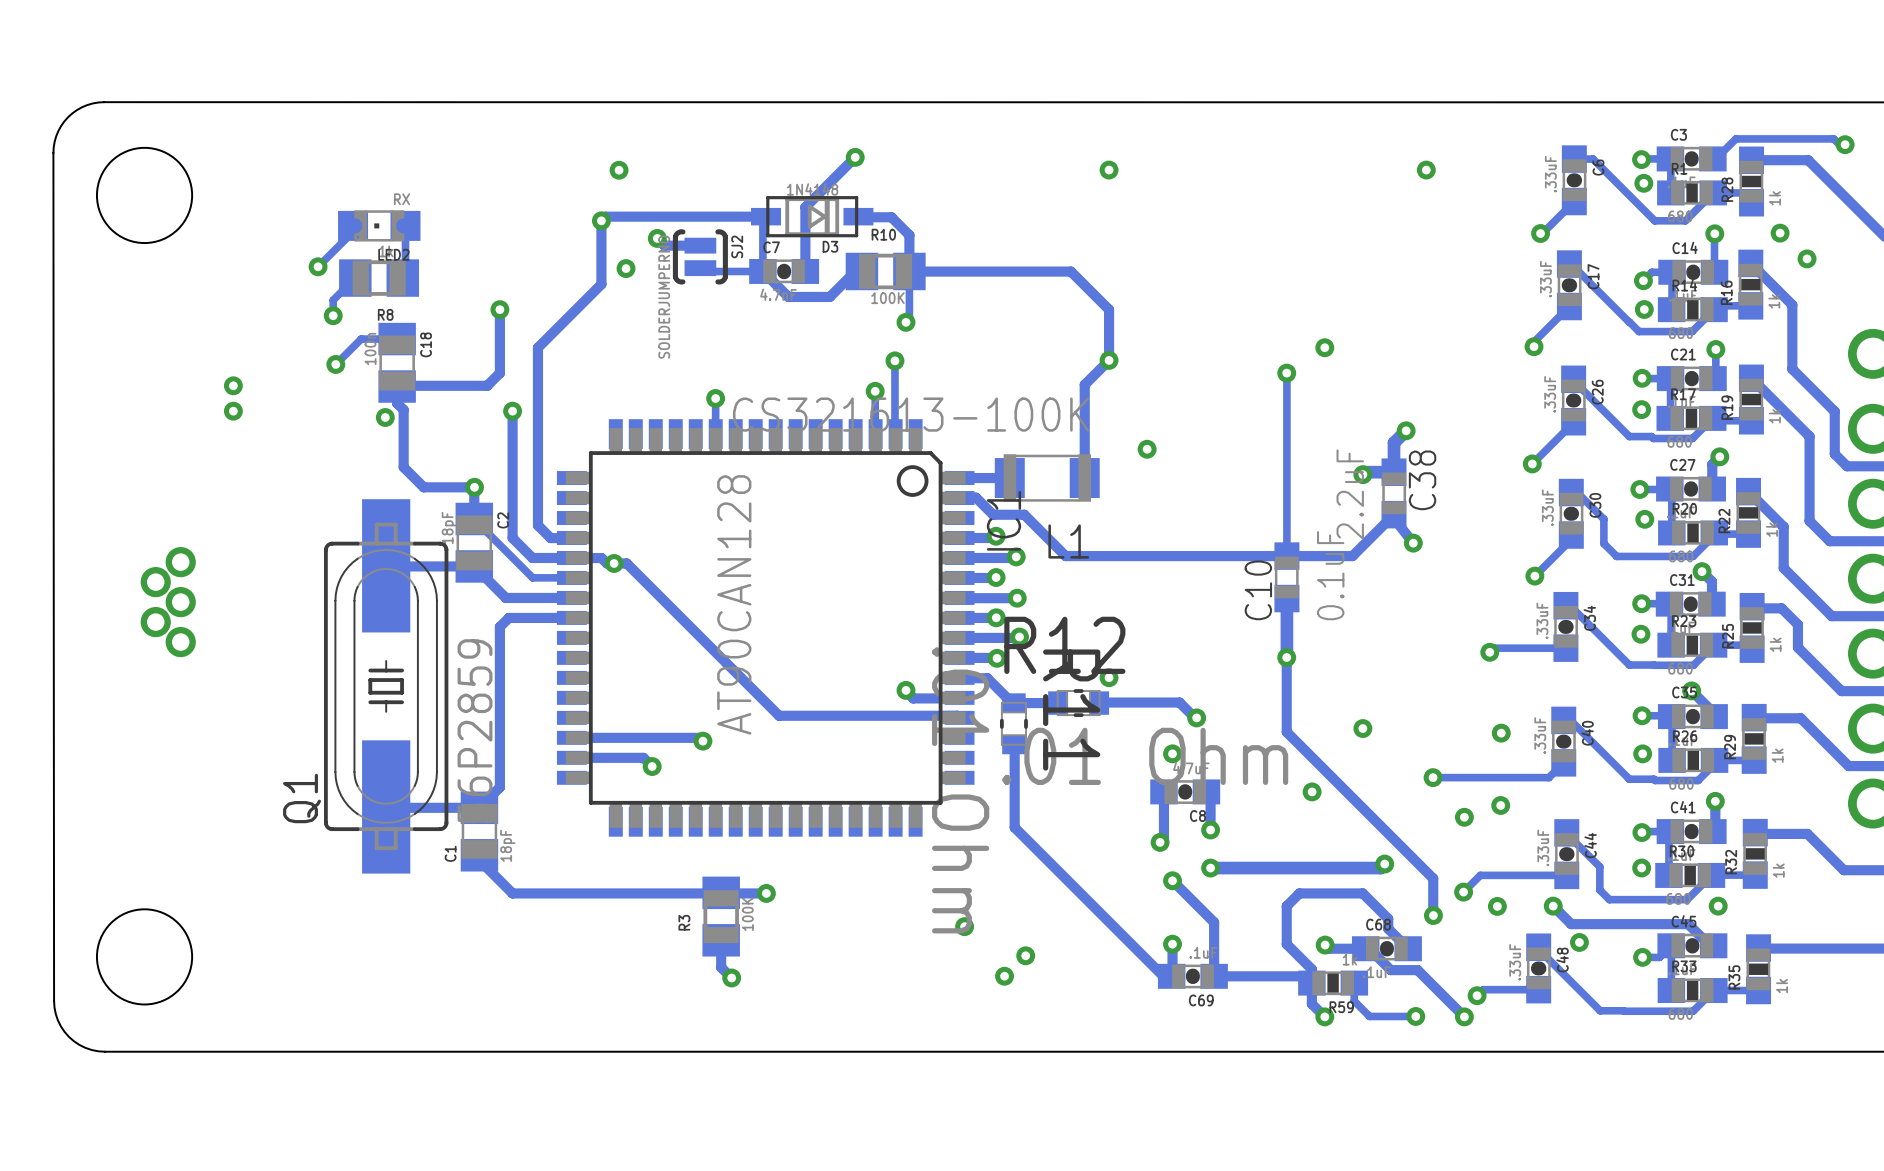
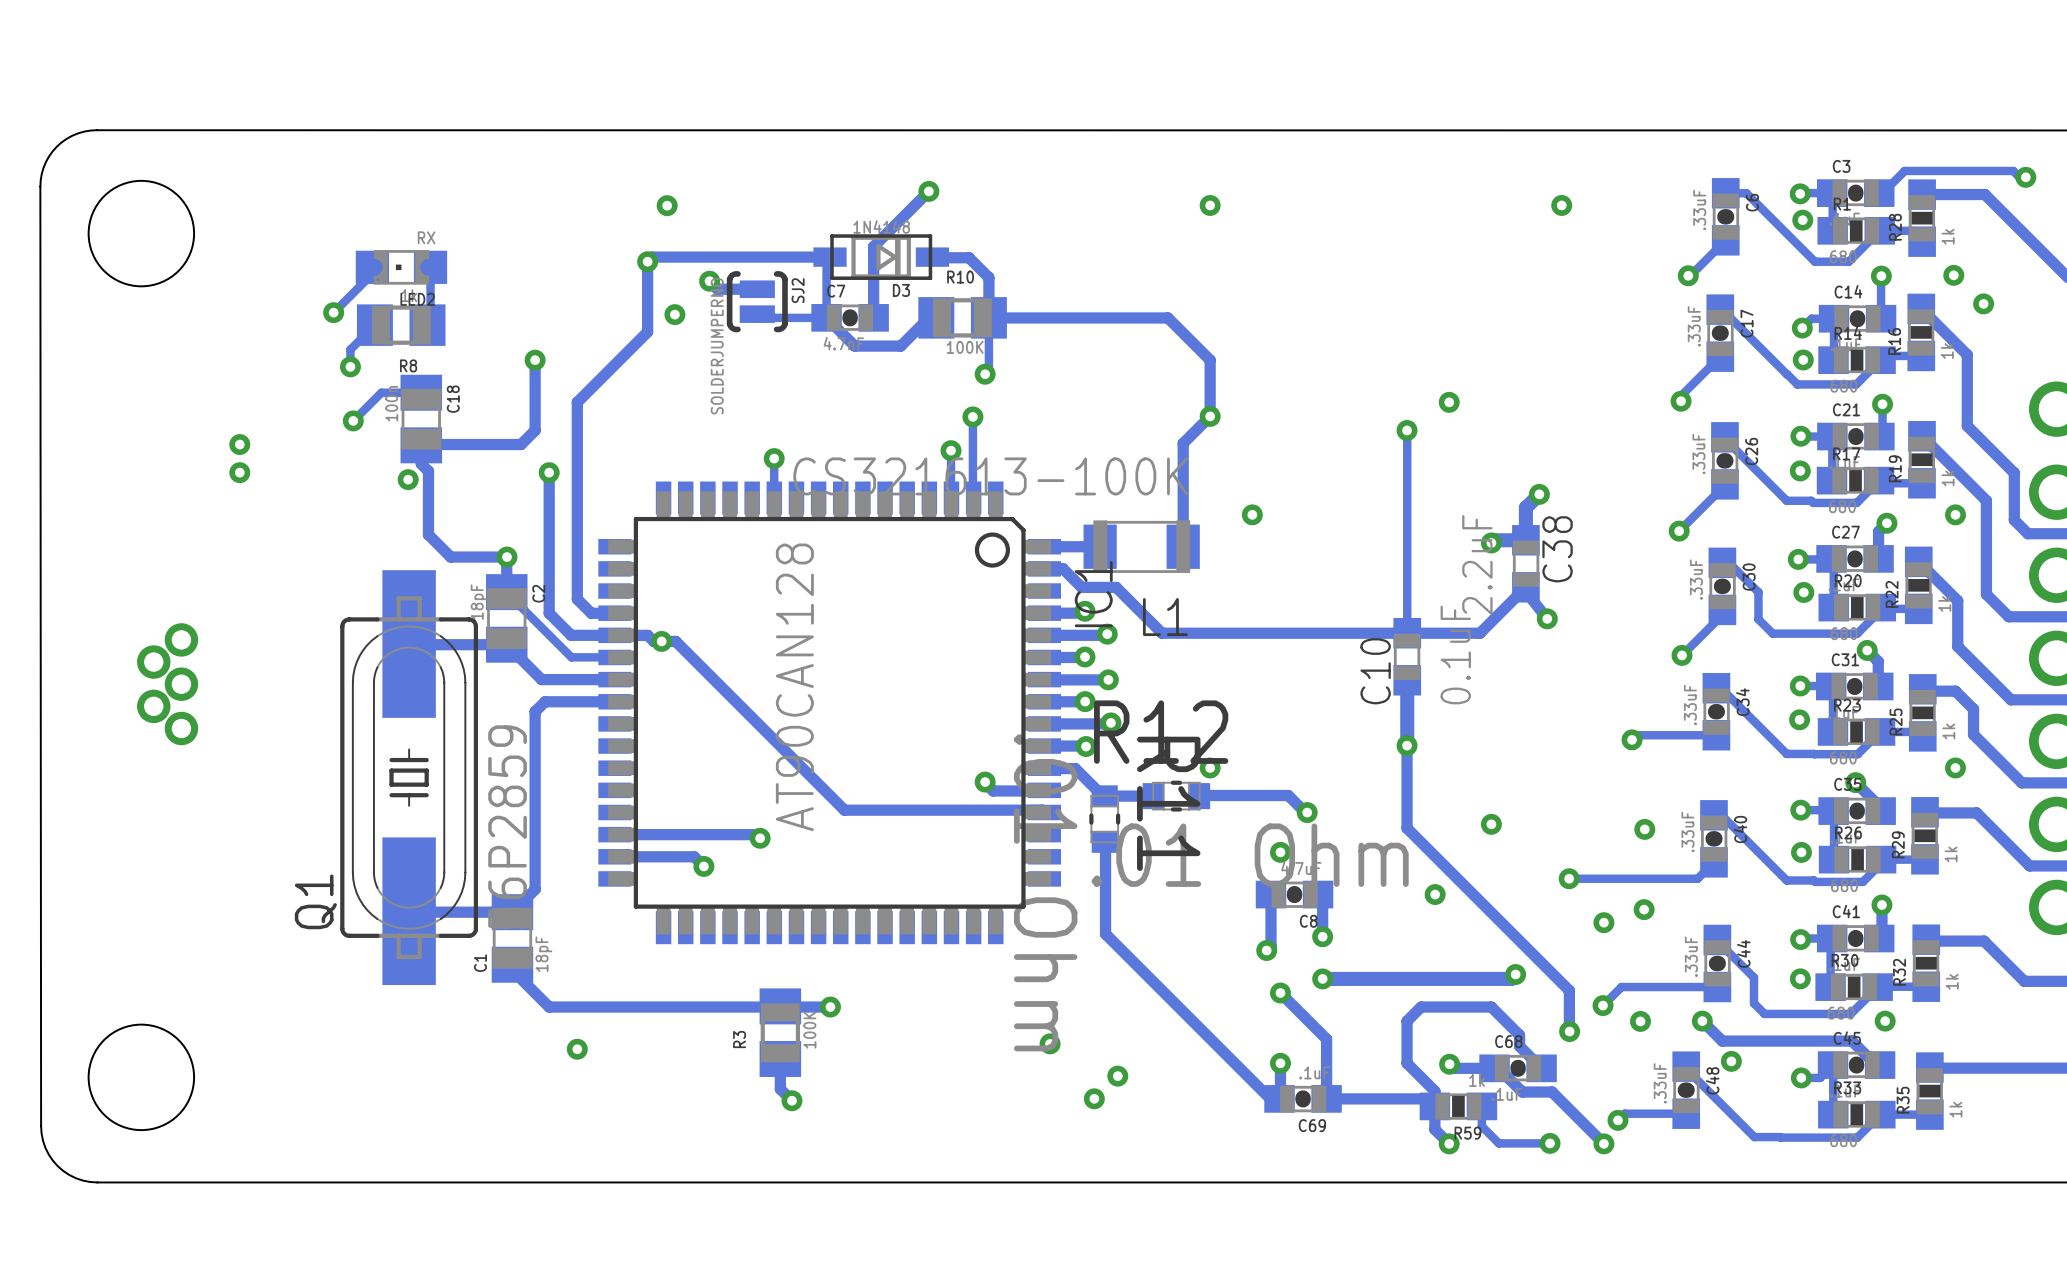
via: none -> (1955, 514)
via: none -> (1955, 767)
via: none -> (577, 1049)

